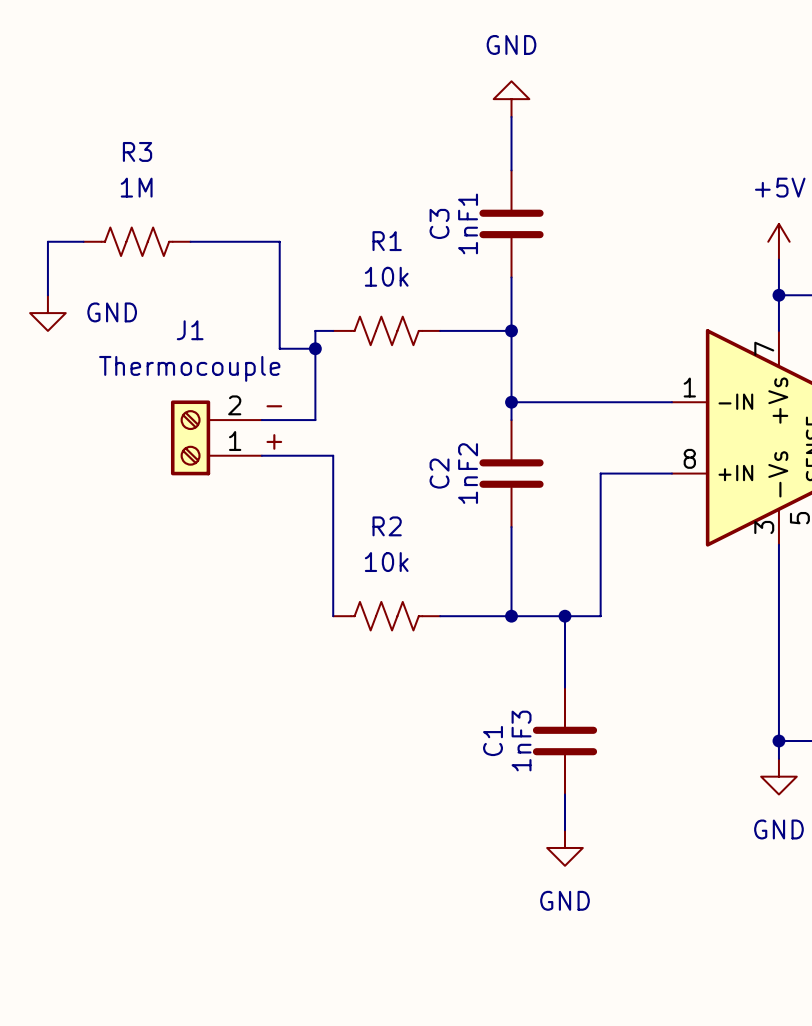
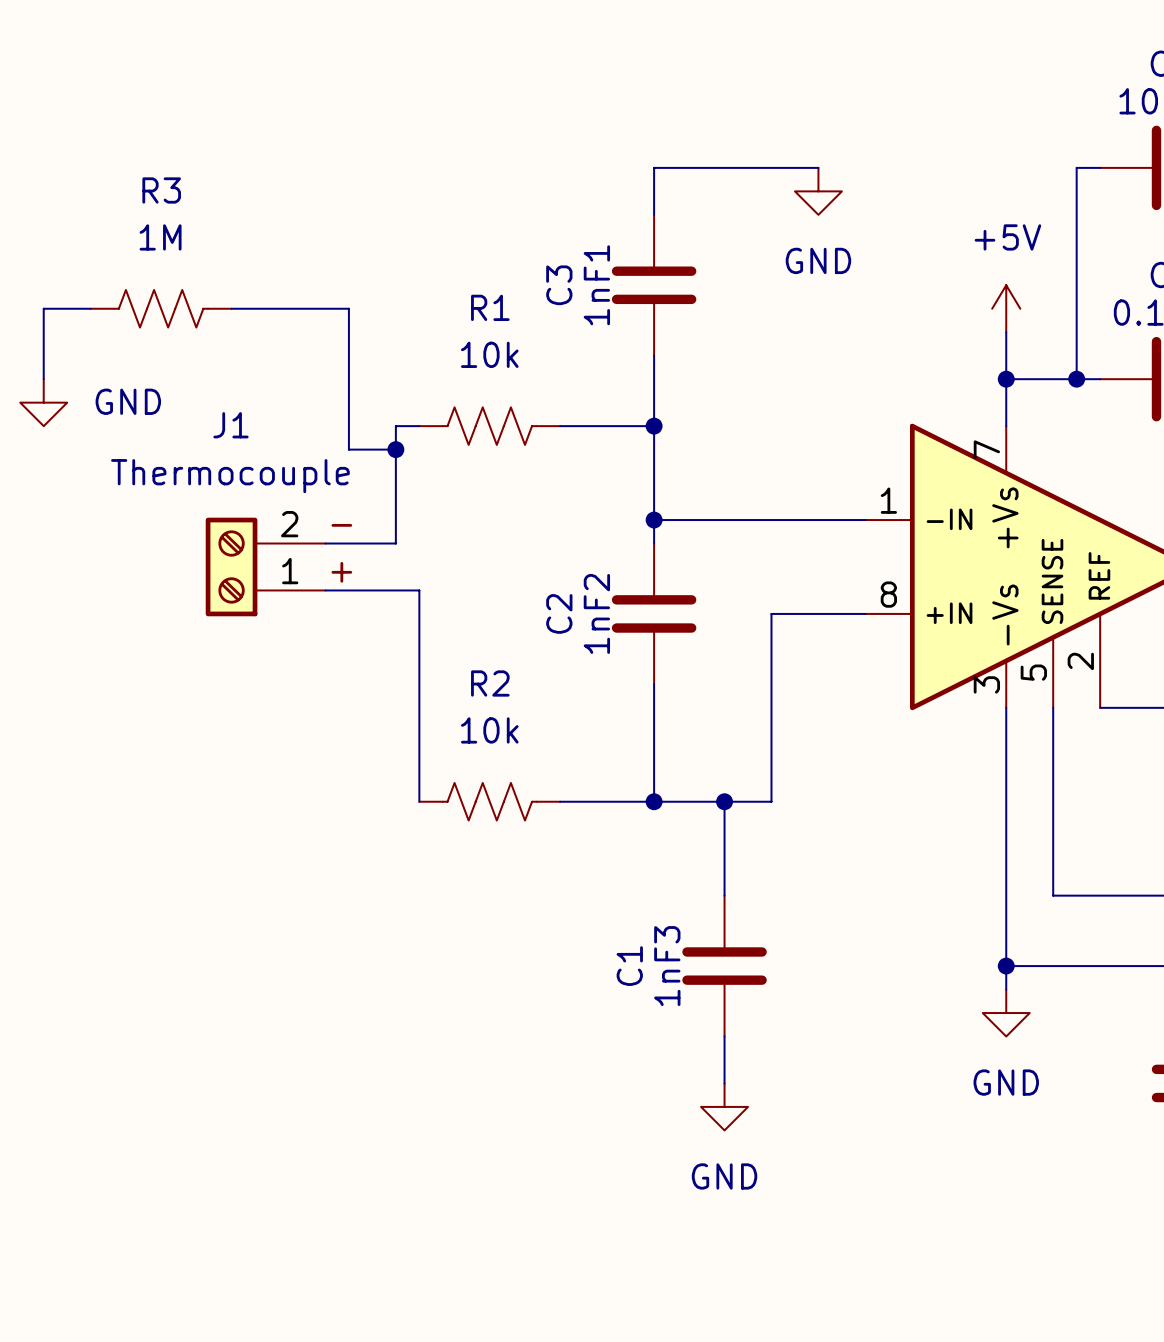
power symbol rotation: 0° (511, 99) -> 180° (818, 191)
power symbol position: GND (511, 99) -> GND (818, 191)
wire: (511, 116) (511, 134) -> (818, 167) (654, 167)

